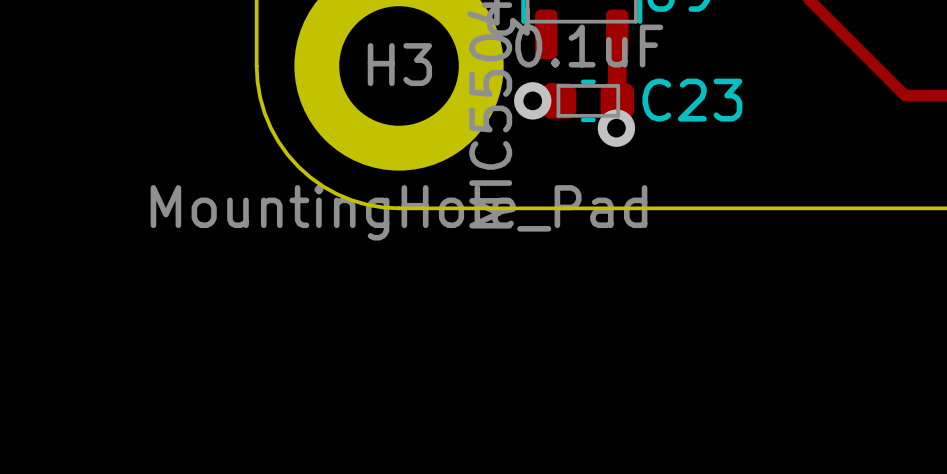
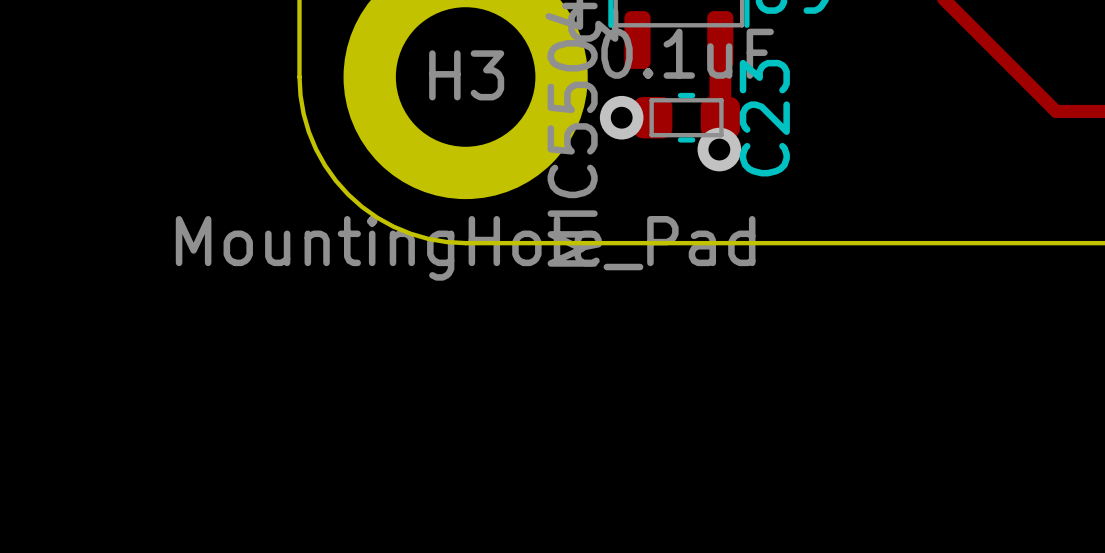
C23 name rotation: 0° (692, 100) -> 90° counterclockwise (764, 118)

